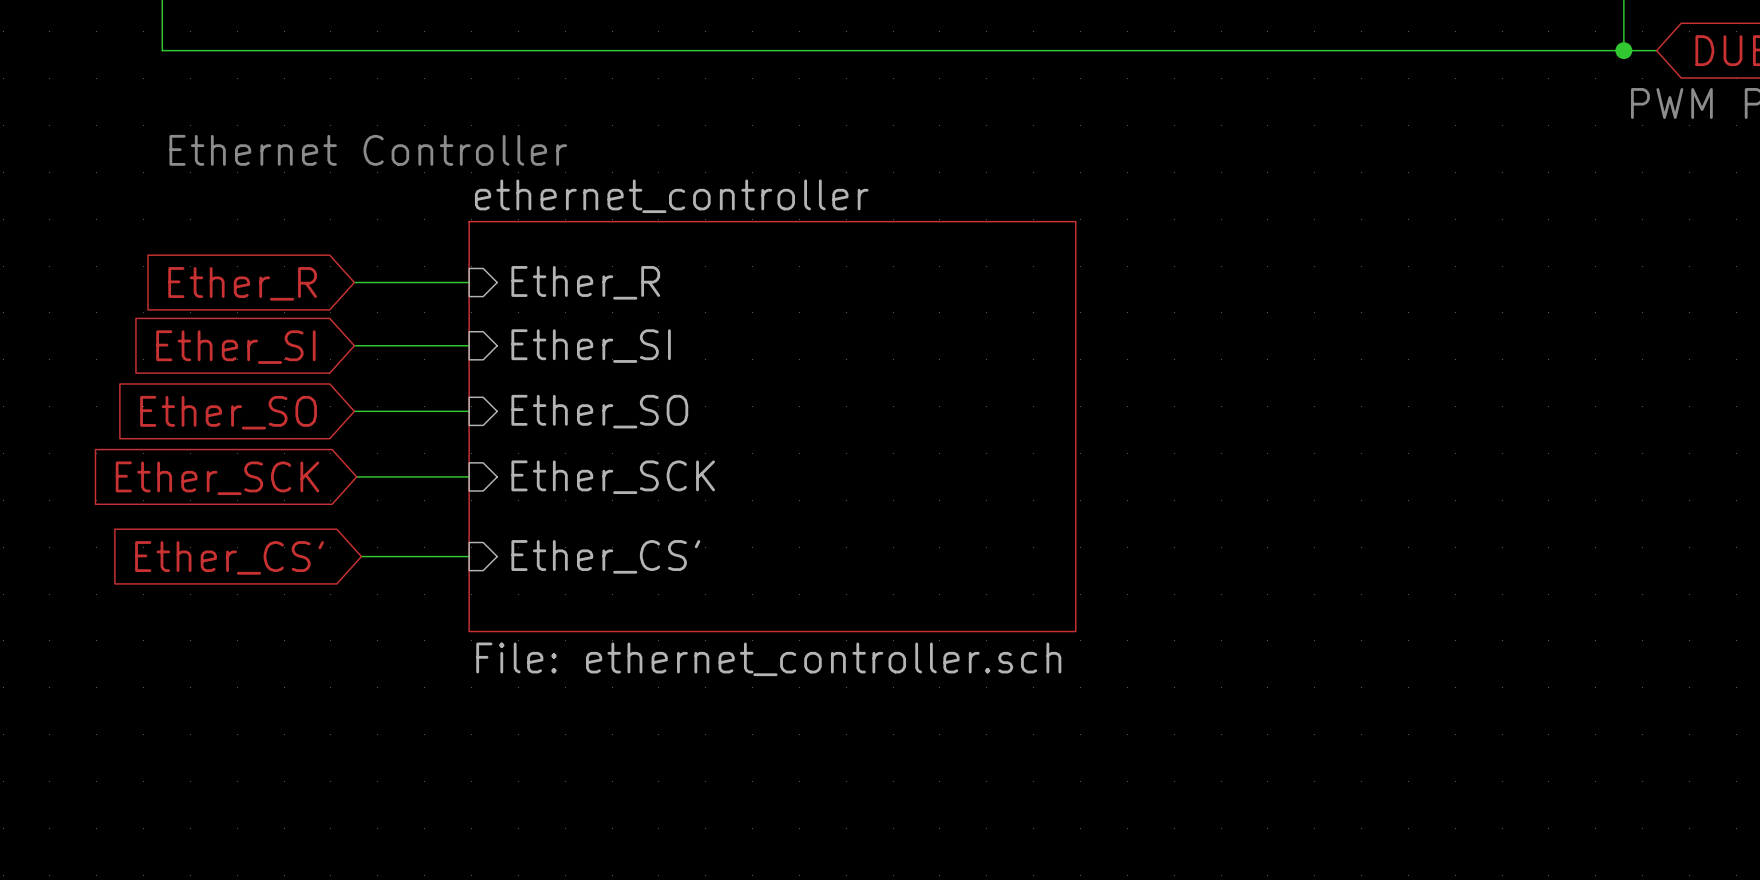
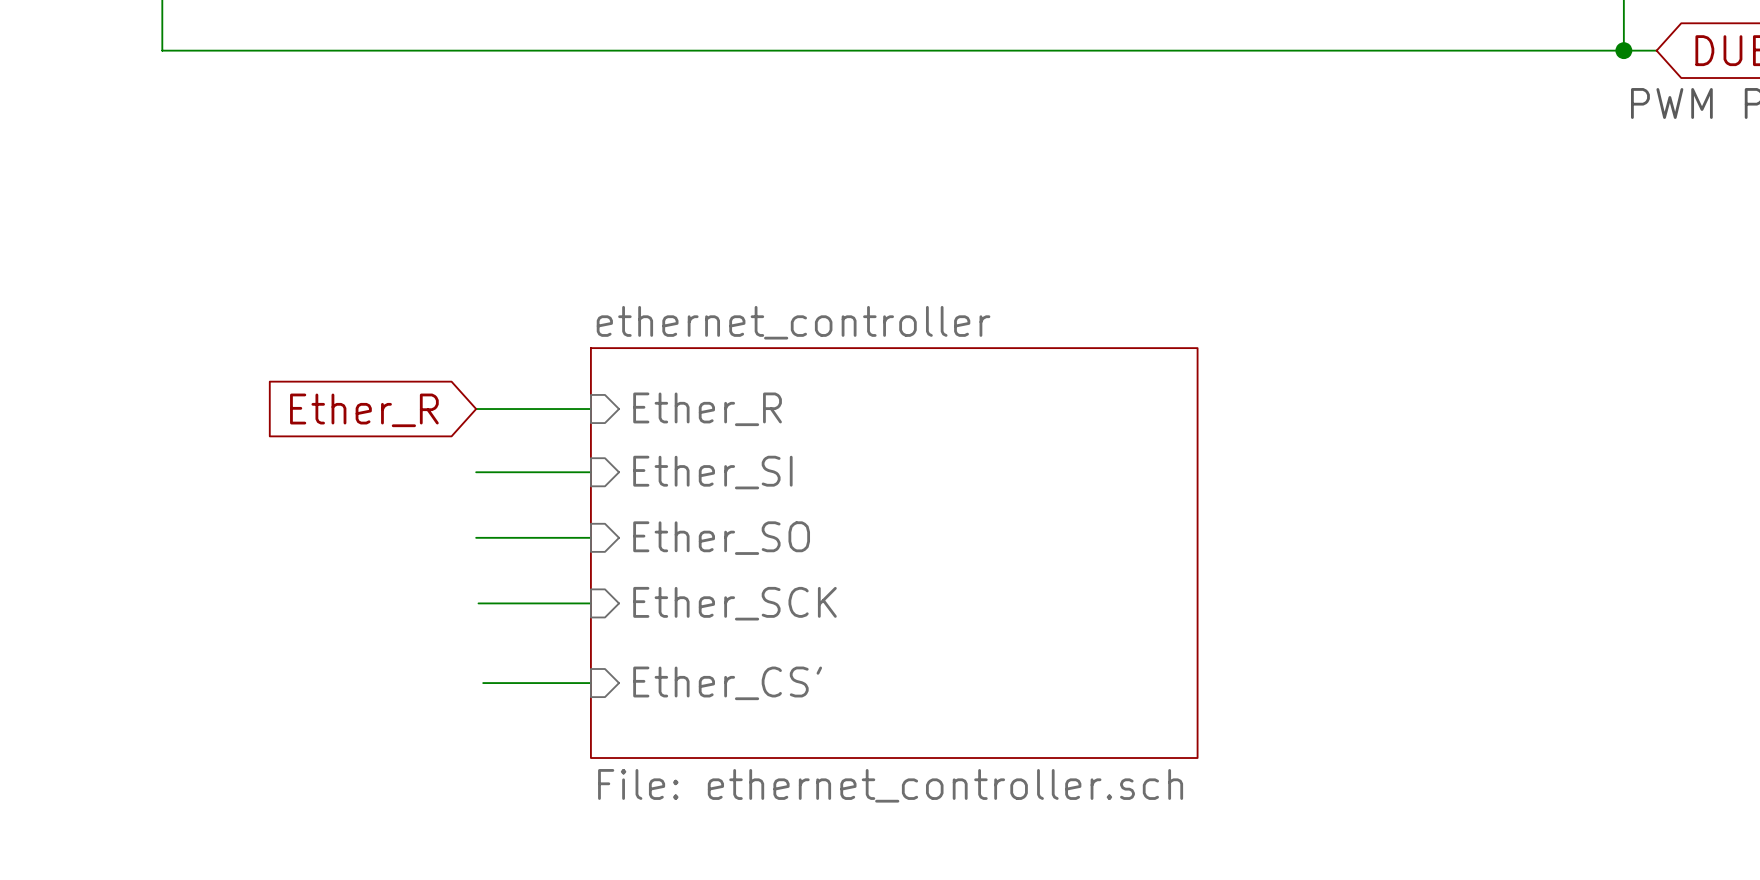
text: Ethernet Controller (368, 150) -> none
wire: (354, 282) (469, 282) -> (476, 409) (590, 409)
sheet pin position: Ether_R (585, 282) -> Ether_R (707, 409)
global label position: Ether_R (242, 283) -> Ether_R (364, 410)
wire: (354, 345) (469, 345) -> (476, 472) (590, 472)
sheet pin position: Ether_SI (591, 346) -> Ether_SI (712, 472)
global label: Ether_SI (235, 347) -> none
wire: (354, 411) (469, 411) -> (476, 537) (590, 537)
sheet pin position: Ether_SO (599, 411) -> Ether_SO (721, 538)
global label: Ether_SO (228, 412) -> none
sheet ethernet_controller position: (772, 426) -> (894, 553)
wire: (356, 476) (469, 476) -> (478, 603) (590, 603)
sheet pin position: Ether_SCK (613, 477) -> Ether_SCK (734, 603)
global label: Ether_SCK (217, 478) -> none
wire: (361, 556) (469, 556) -> (483, 683) (590, 683)
sheet pin position: Ether_CS' (605, 556) -> Ether_CS' (727, 683)
global label: Ether_CS' (229, 557) -> none

